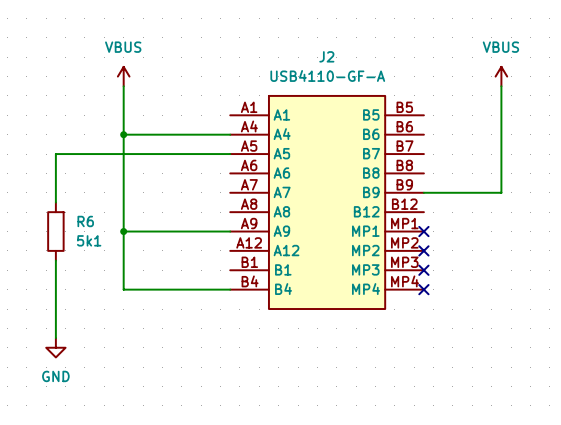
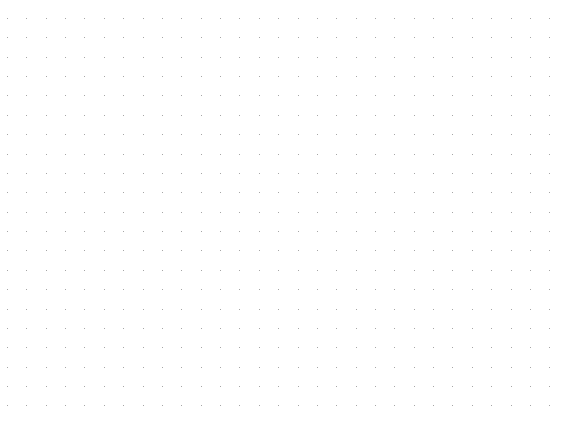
power symbol: VBUS (123, 76) -> none
power symbol: VBUS (501, 76) -> none
wire: (123, 86) (123, 289) (230, 289) -> none
wire: (501, 86) (501, 192) (423, 192) -> none
wire: (123, 134) (230, 134) -> none
junction: (123, 134) -> none
wire: (230, 154) (55, 154) (55, 202) -> none
J2: USB4110-GF-A (327, 202) -> none
R6: 5k1 (55, 231) -> none
wire: (123, 231) (230, 231) -> none
junction: (123, 231) -> none
no-connect mark: (423, 231) -> none
no-connect mark: (423, 250) -> none
wire: (55, 260) (55, 338) -> none
no-connect mark: (423, 270) -> none
no-connect mark: (423, 289) -> none
power symbol: GND (55, 347) -> none

